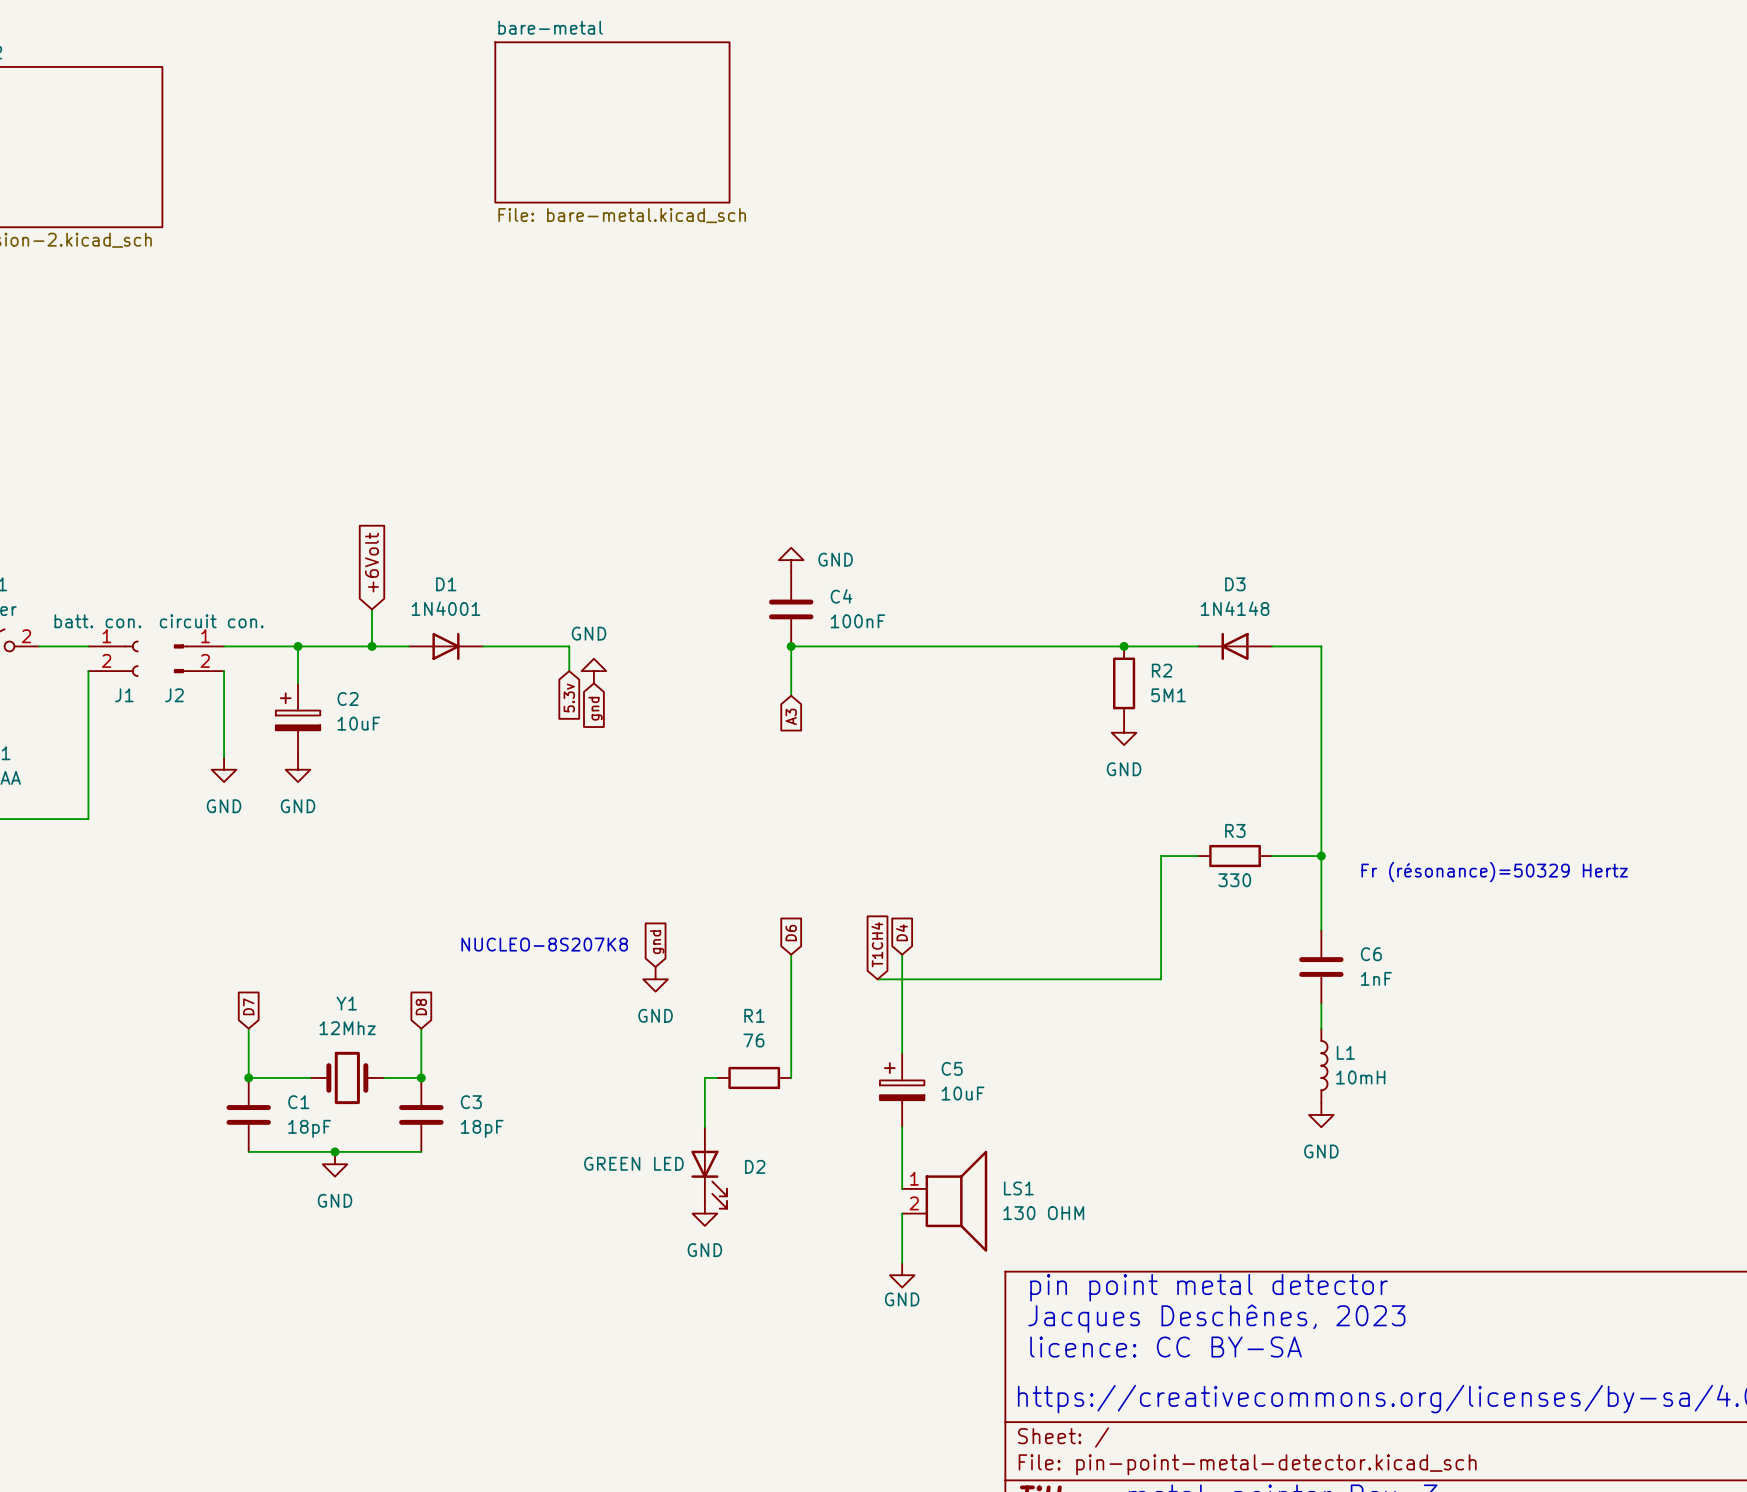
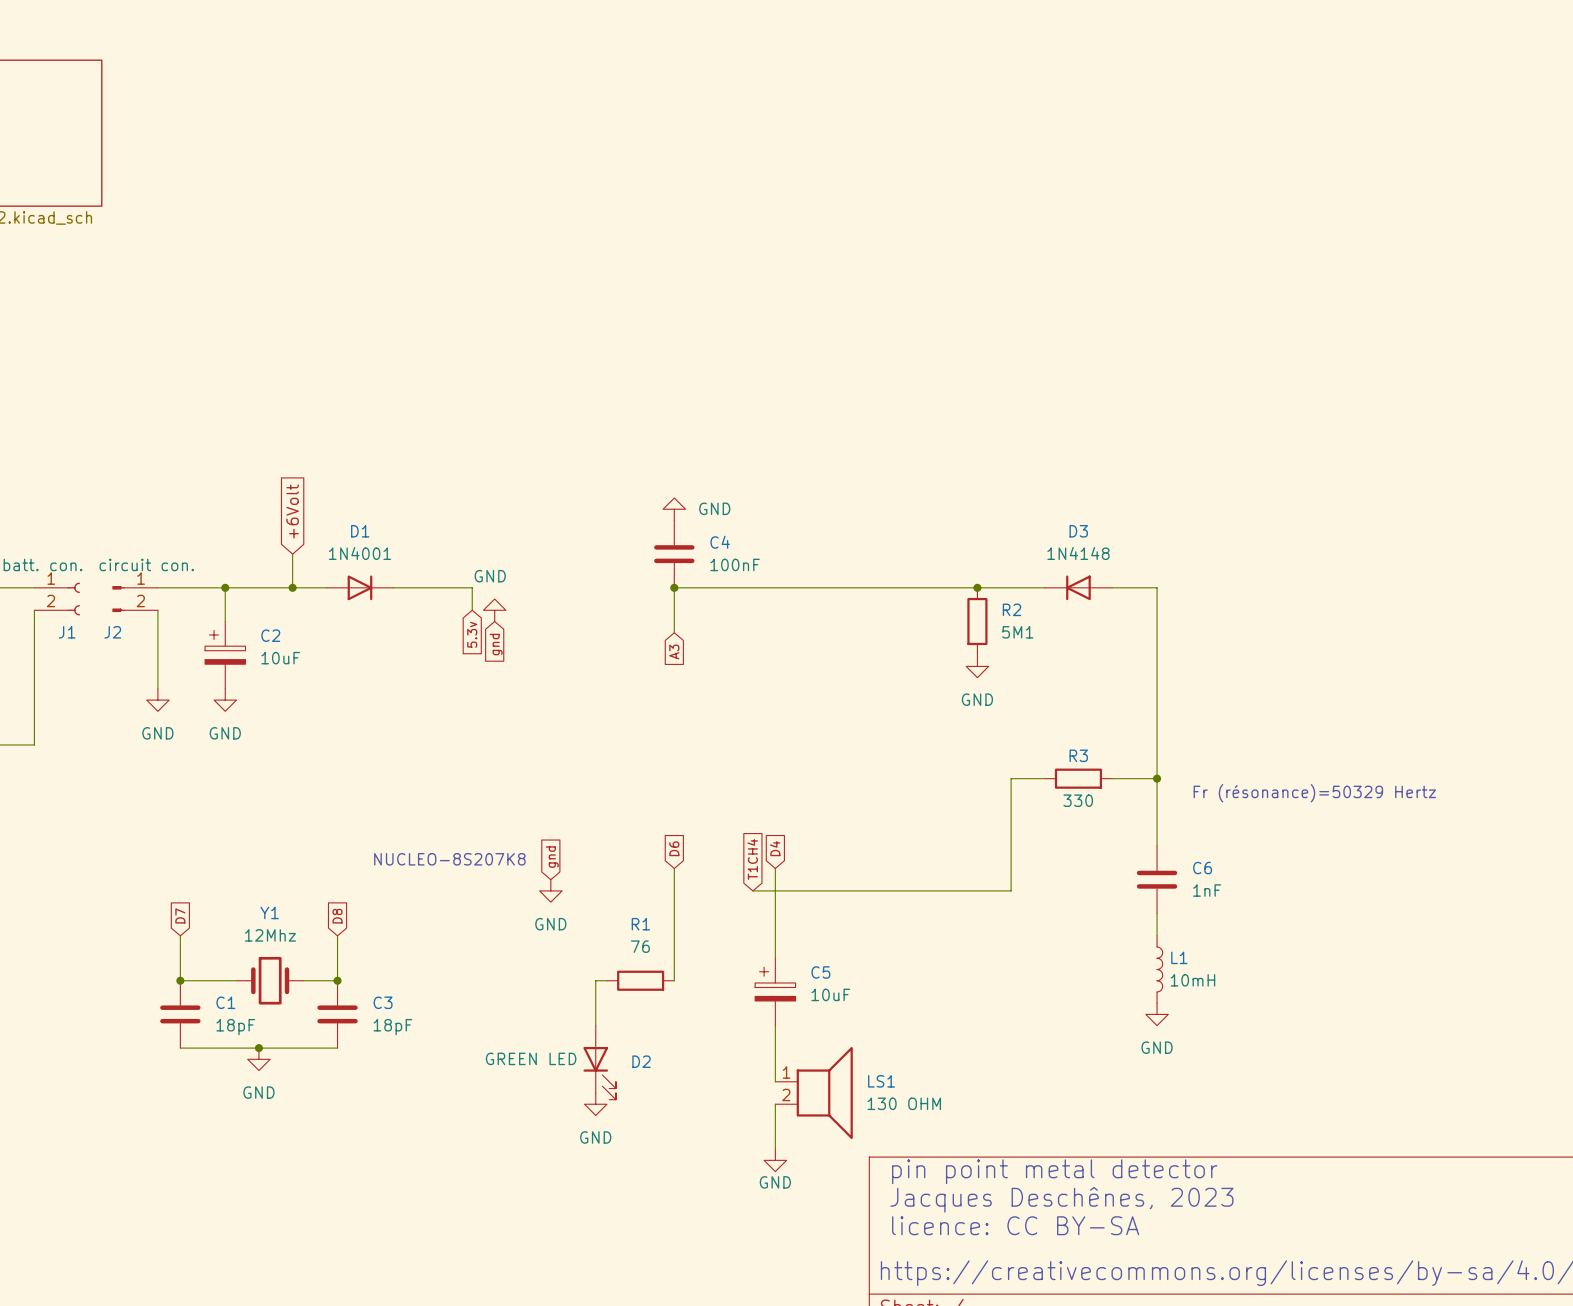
sheet bare-metal: File: bare-metal.kicad_sch (612, 122) -> none

